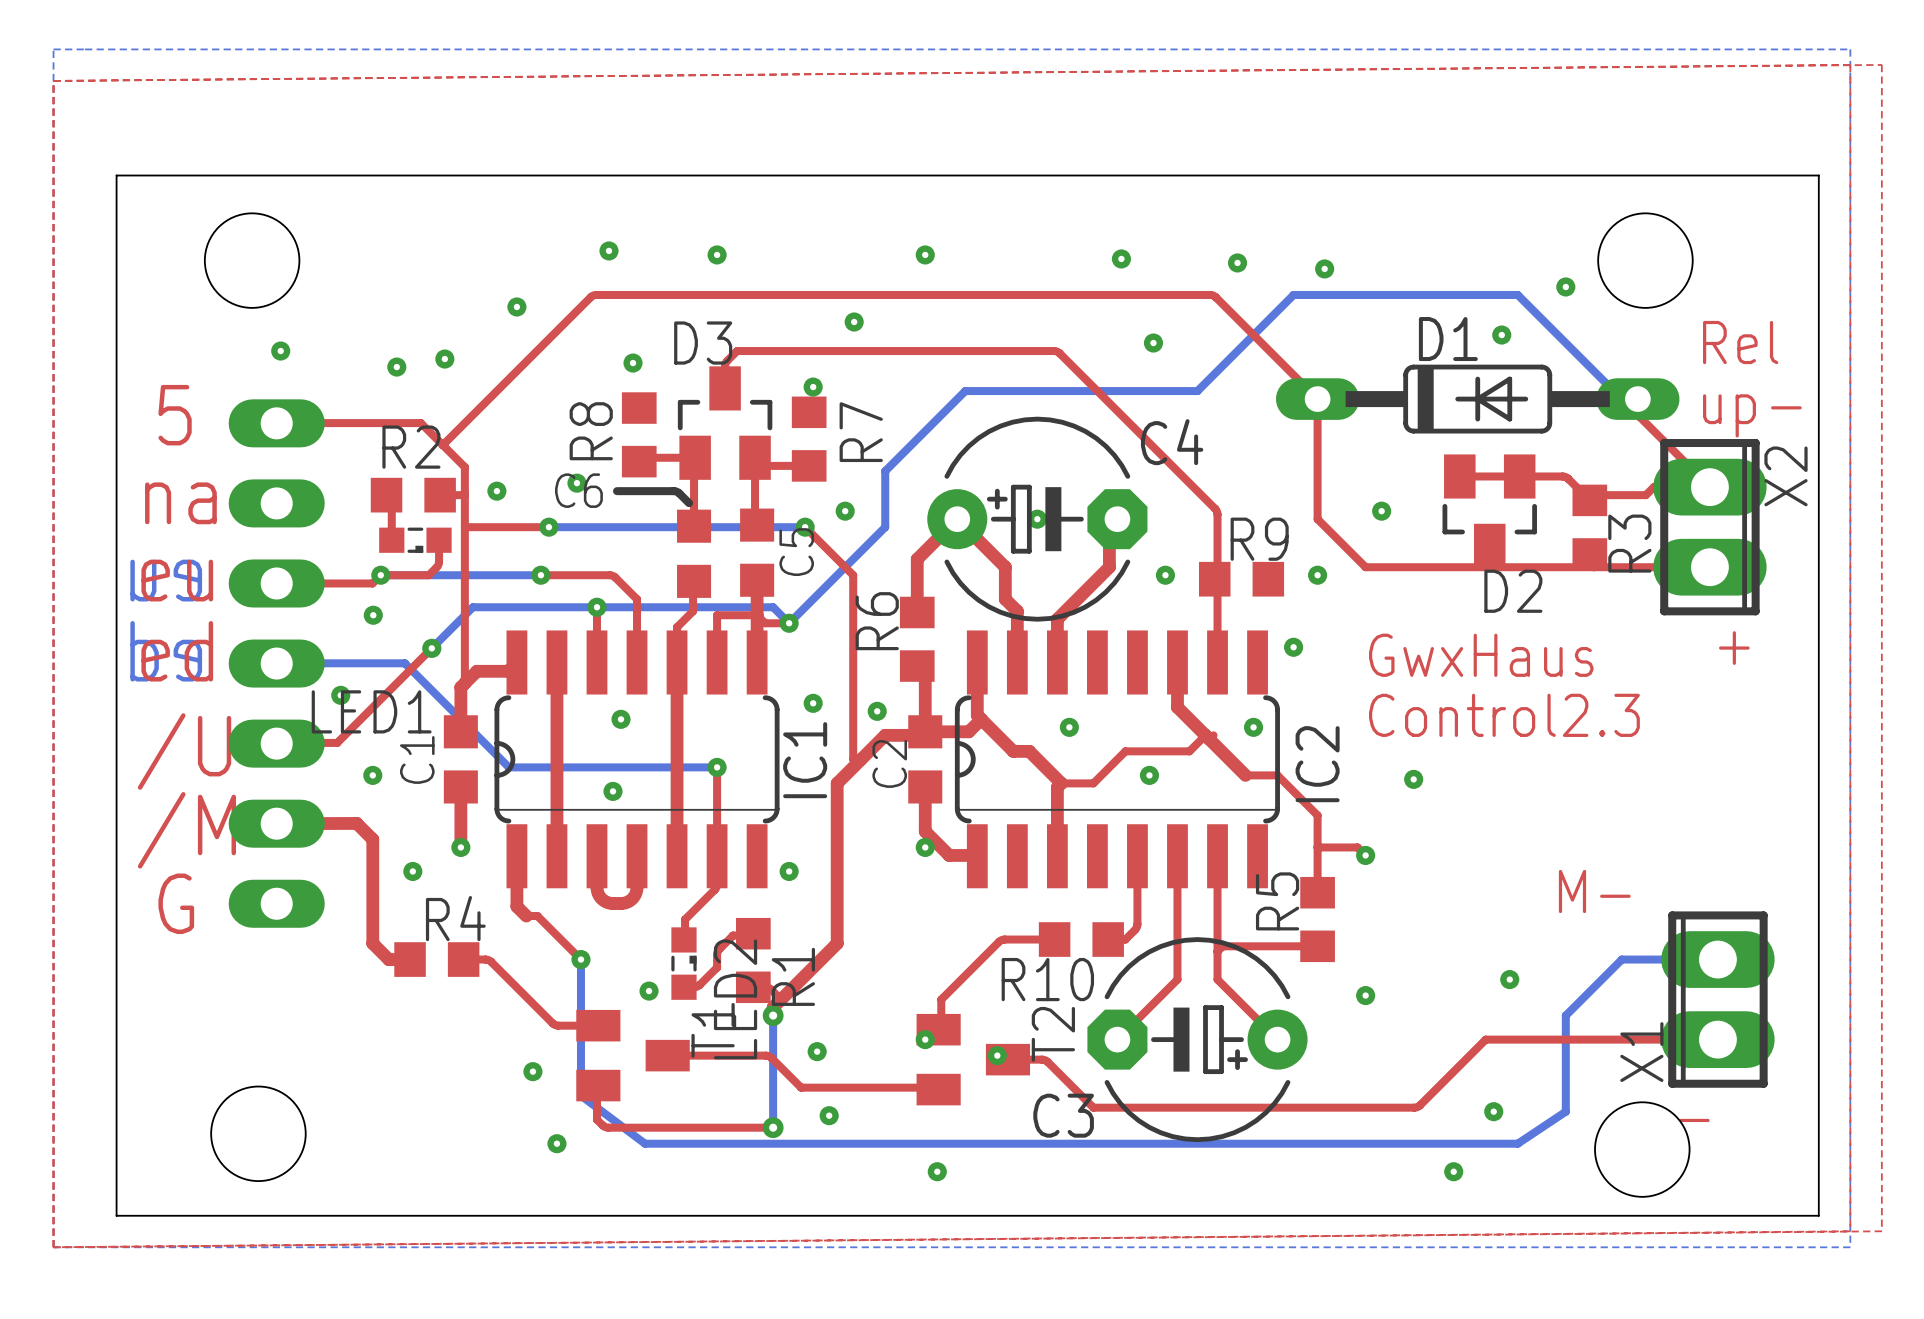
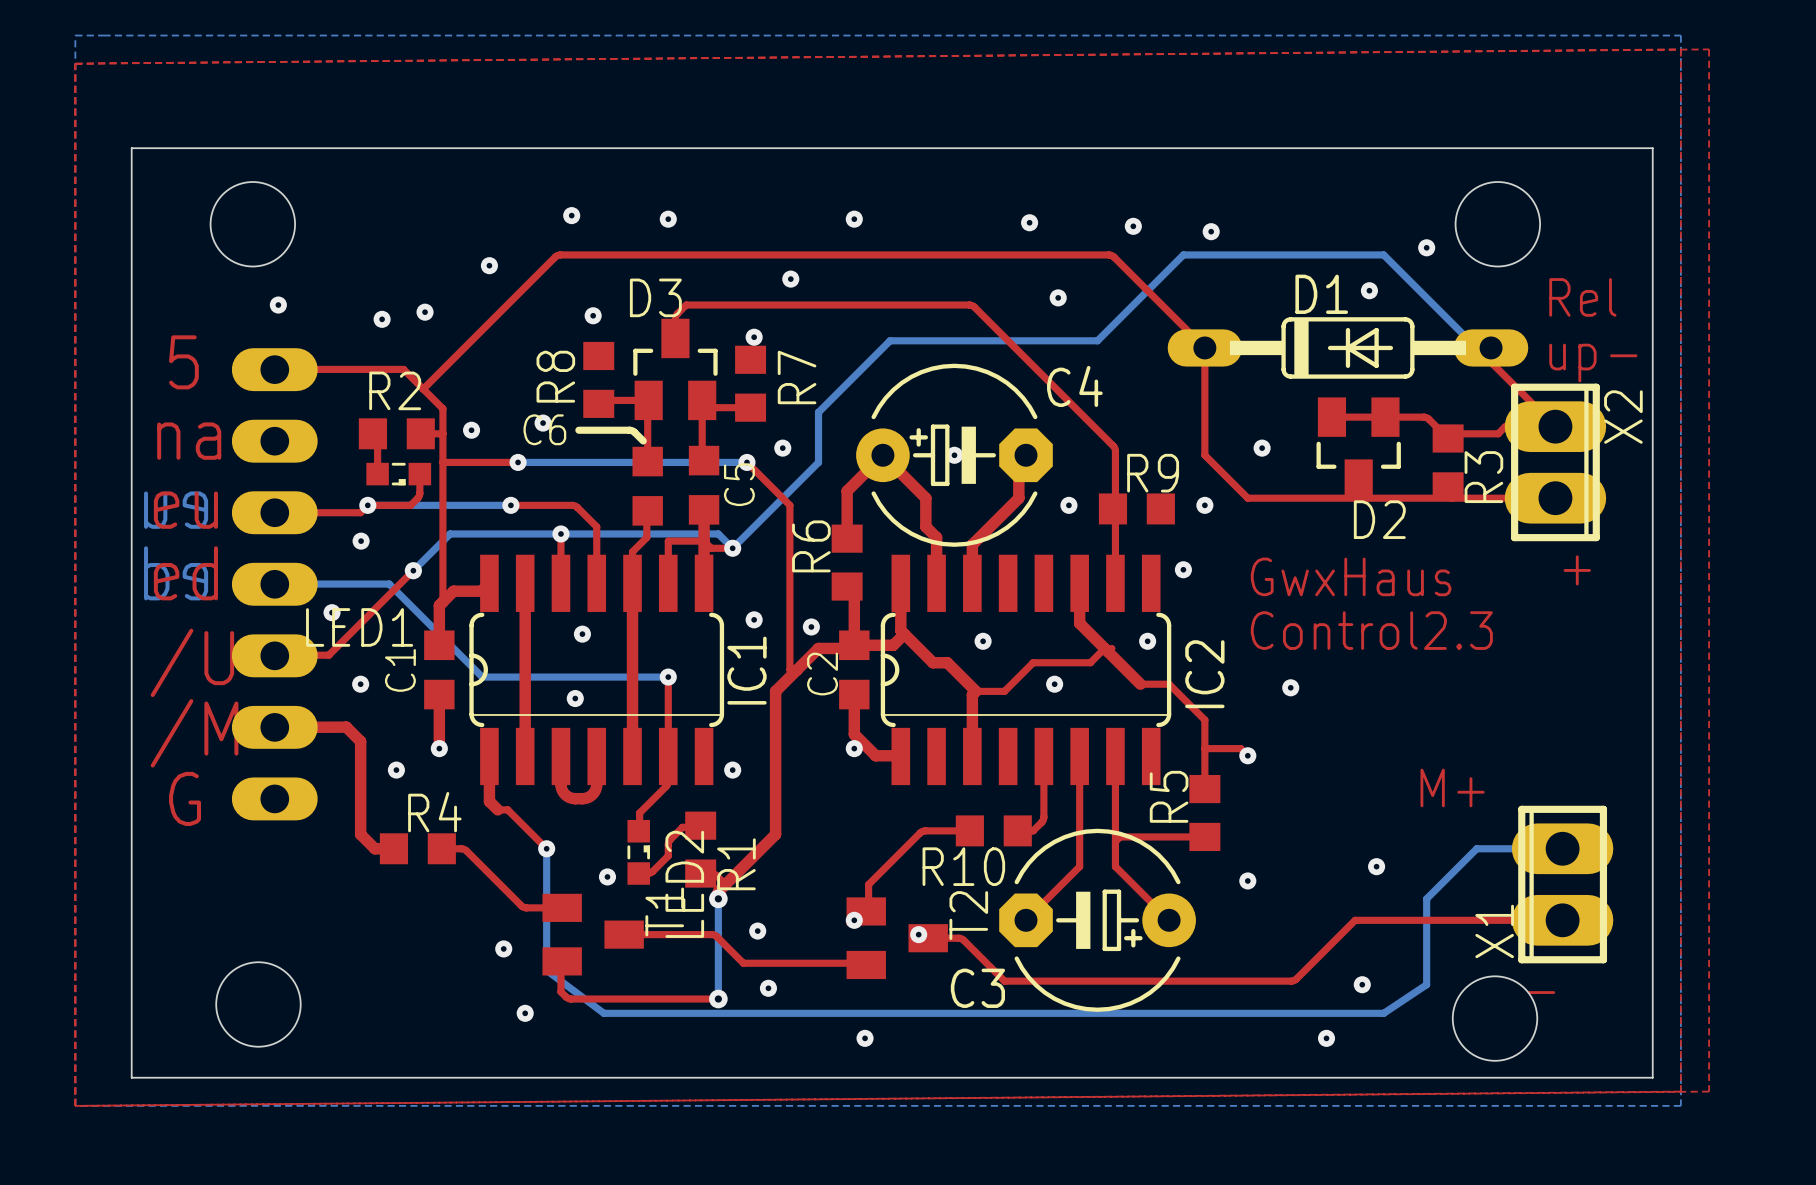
text: M- (1594, 891) -> M+ (1452, 787)

